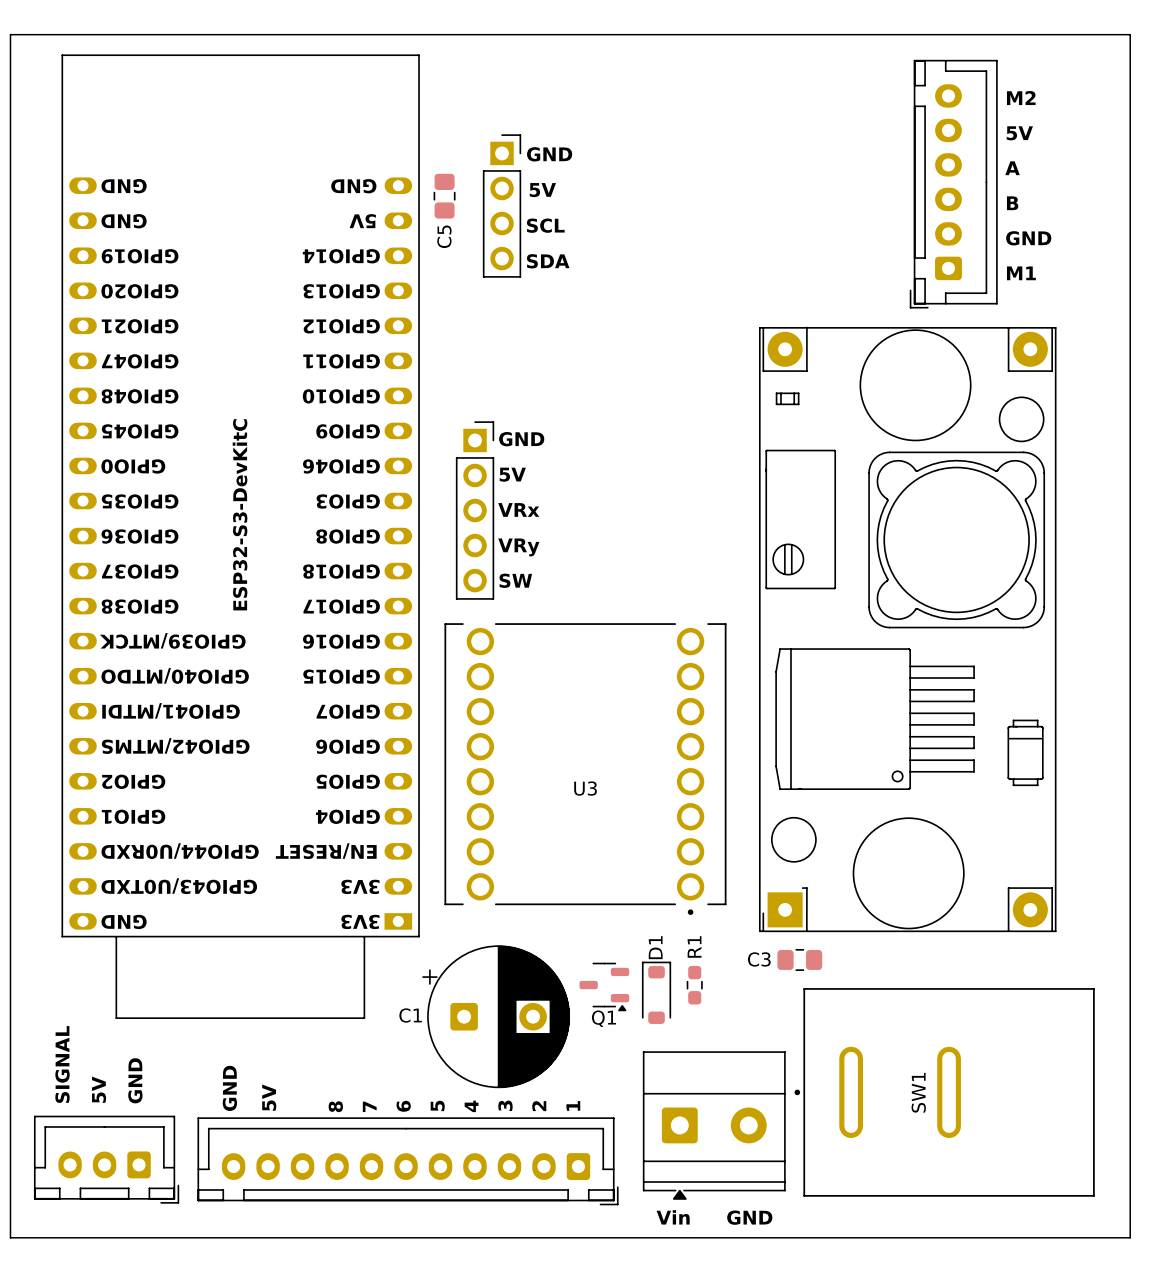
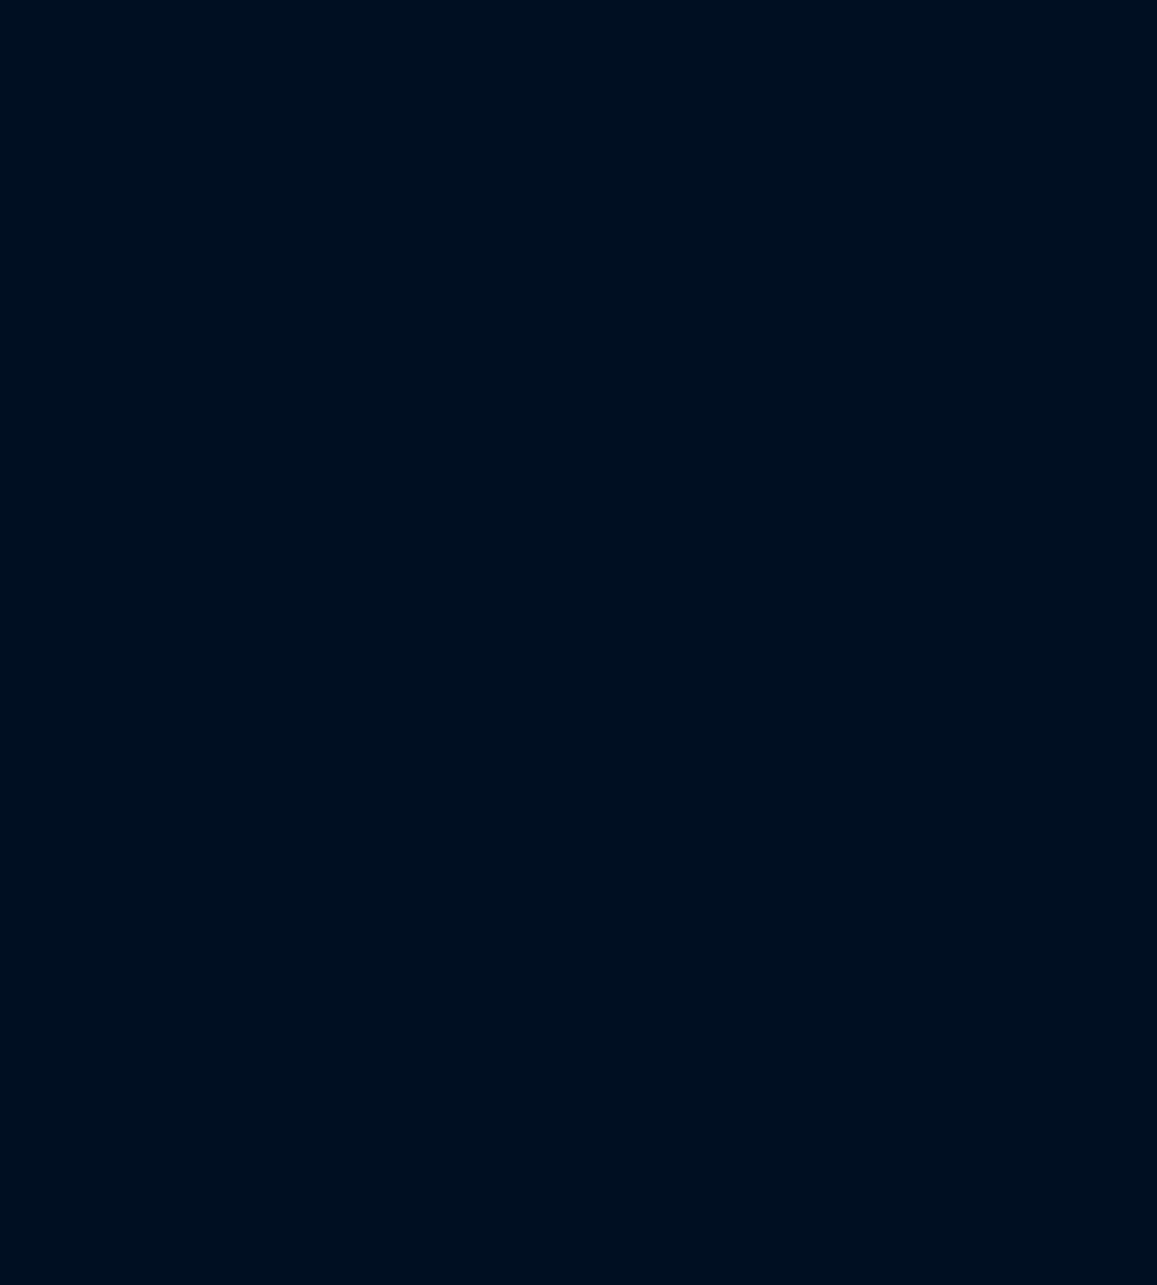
board edge: (10, 34) (1130, 34) (1130, 1237) (10, 1237) (10, 34) -> none
text: M2 (1021, 98) -> none
text: 5V (1019, 133) -> none
text: GND (549, 154) -> none
text: A (1012, 168) -> none
part: (953, 184) -> none
text: 5V (542, 190) -> none
C5: (444, 196) -> none
text: B (1012, 203) -> none
part: (502, 206) -> none
text: SCL (545, 225) -> none
text: GND (1028, 238) -> none
text: SDA (548, 261) -> none
text: M1 (1021, 273) -> none
text: GND (521, 439) -> none
text: 5V (512, 474) -> none
text: VRx (518, 509) -> none
part: (475, 510) -> none
part: ESP32-S3-DevKitC (240, 536) -> none
text: VRy (518, 547) -> none
text: SW (515, 580) -> none
part: (907, 629) -> none
U3: (585, 769) -> none
C3: (799, 959) -> none
R1: (694, 985) -> none
Q1: (604, 986) -> none
D1: (656, 992) -> none
C1: (496, 1016) -> none
text: SIGNAL (62, 1064) -> none
text: GND (135, 1080) -> none
text: GND (229, 1088) -> none
text: 5V (99, 1089) -> none
SW1: (944, 1092) -> none
text: 5V (269, 1097) -> none
text: 5 (437, 1105) -> none
text: 3 (505, 1105) -> none
text: 1 (573, 1105) -> none
text: 8 (335, 1106) -> none
text: 7 (369, 1106) -> none
text: 6 (403, 1106) -> none
text: 4 (471, 1106) -> none
text: 2 (539, 1106) -> none
part: (714, 1125) -> none
part: (106, 1159) -> none
part: (408, 1161) -> none
text: Vin (673, 1217) -> none
text: GND (749, 1217) -> none

